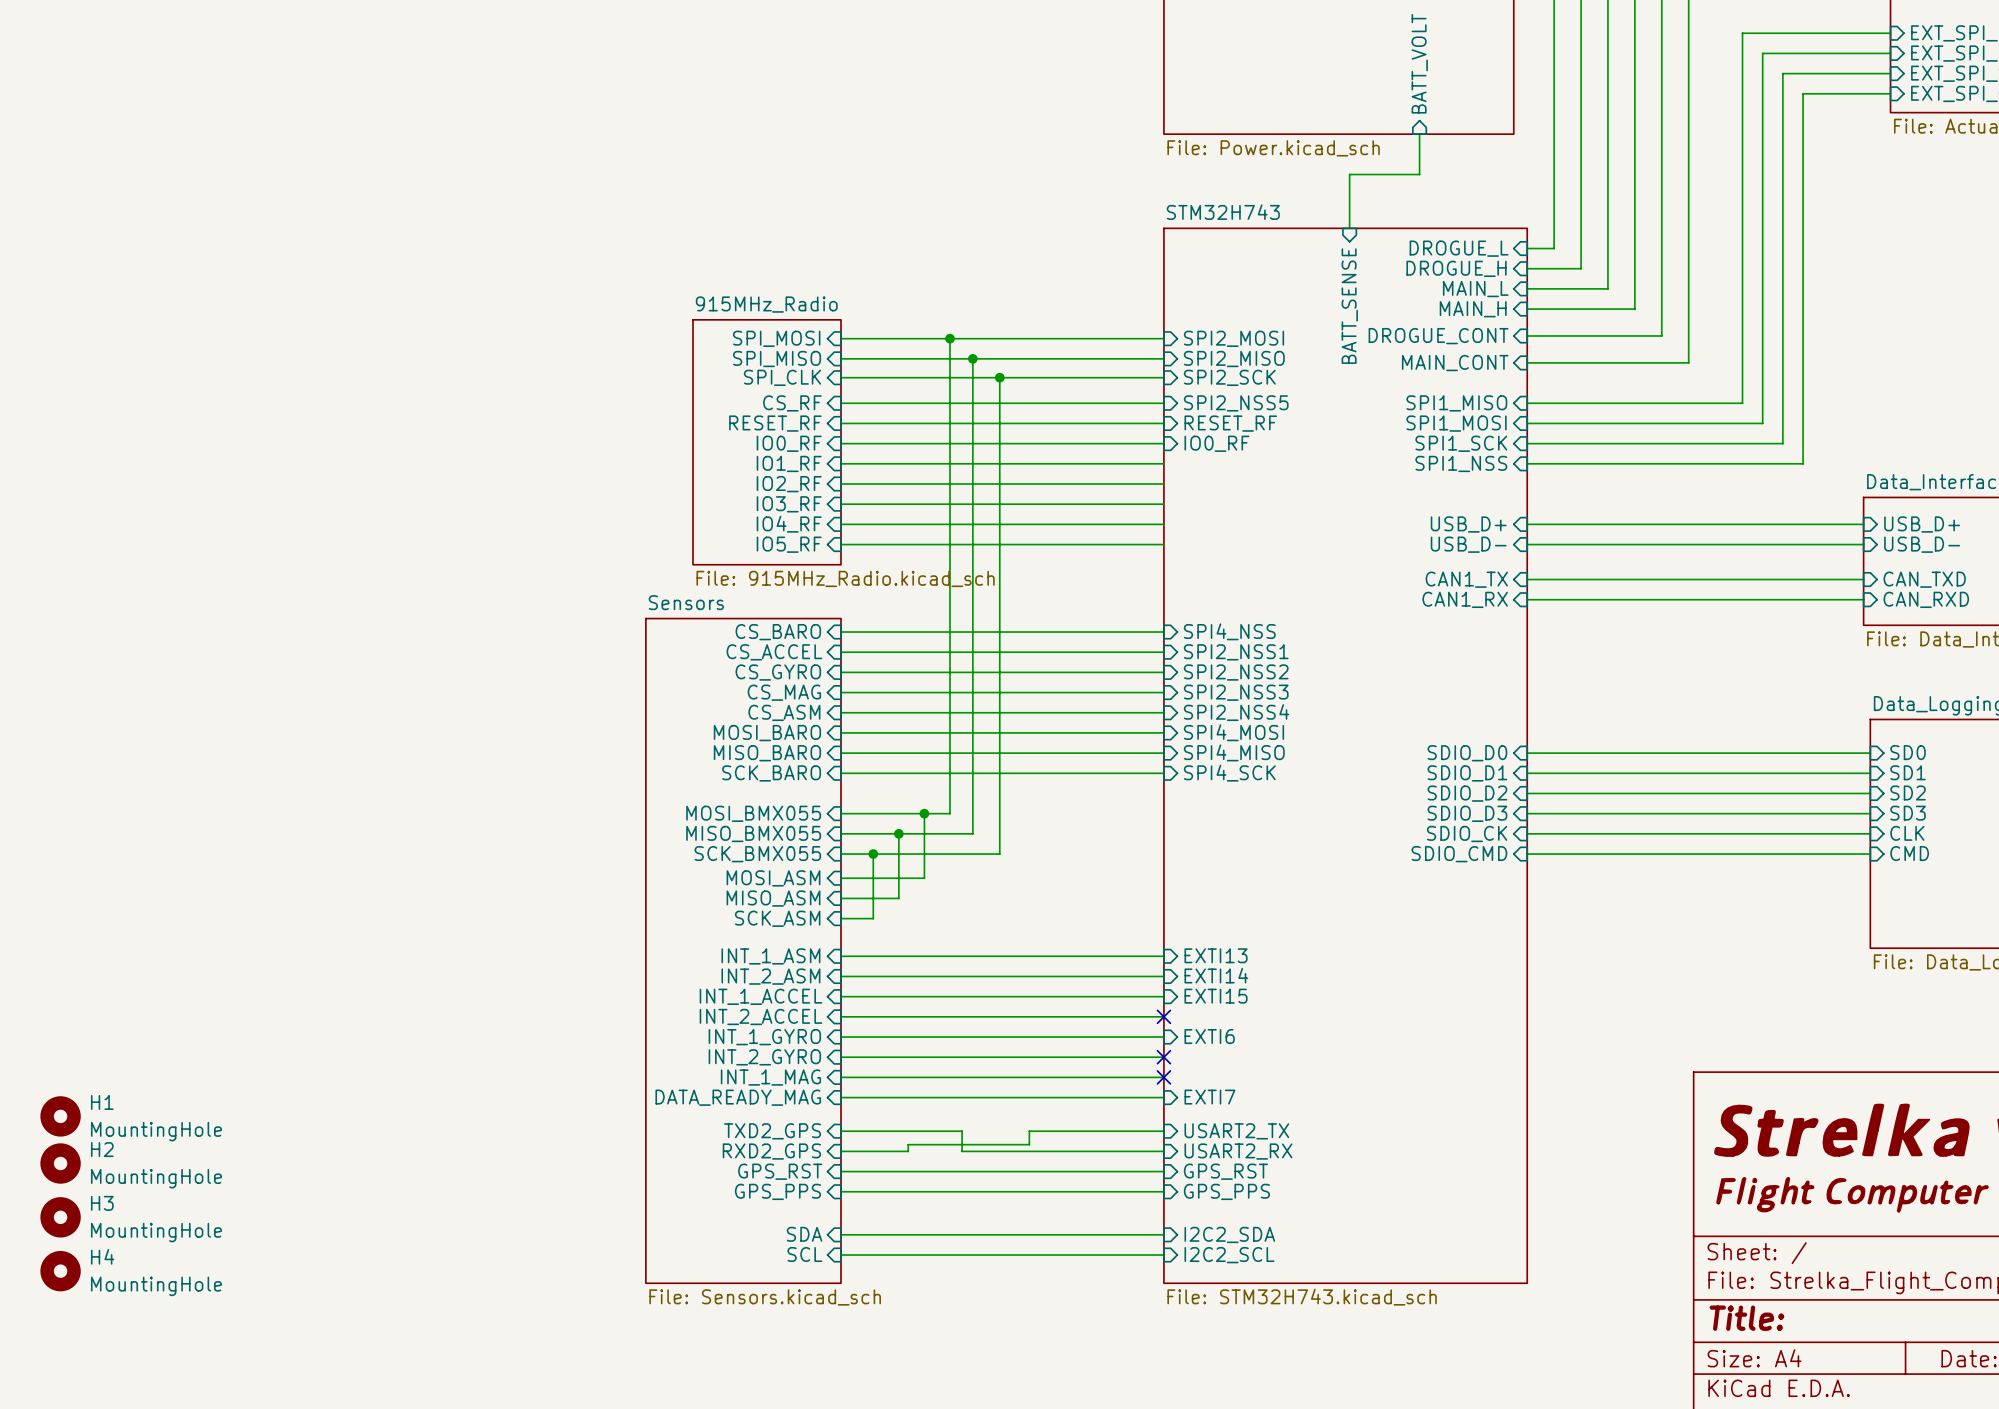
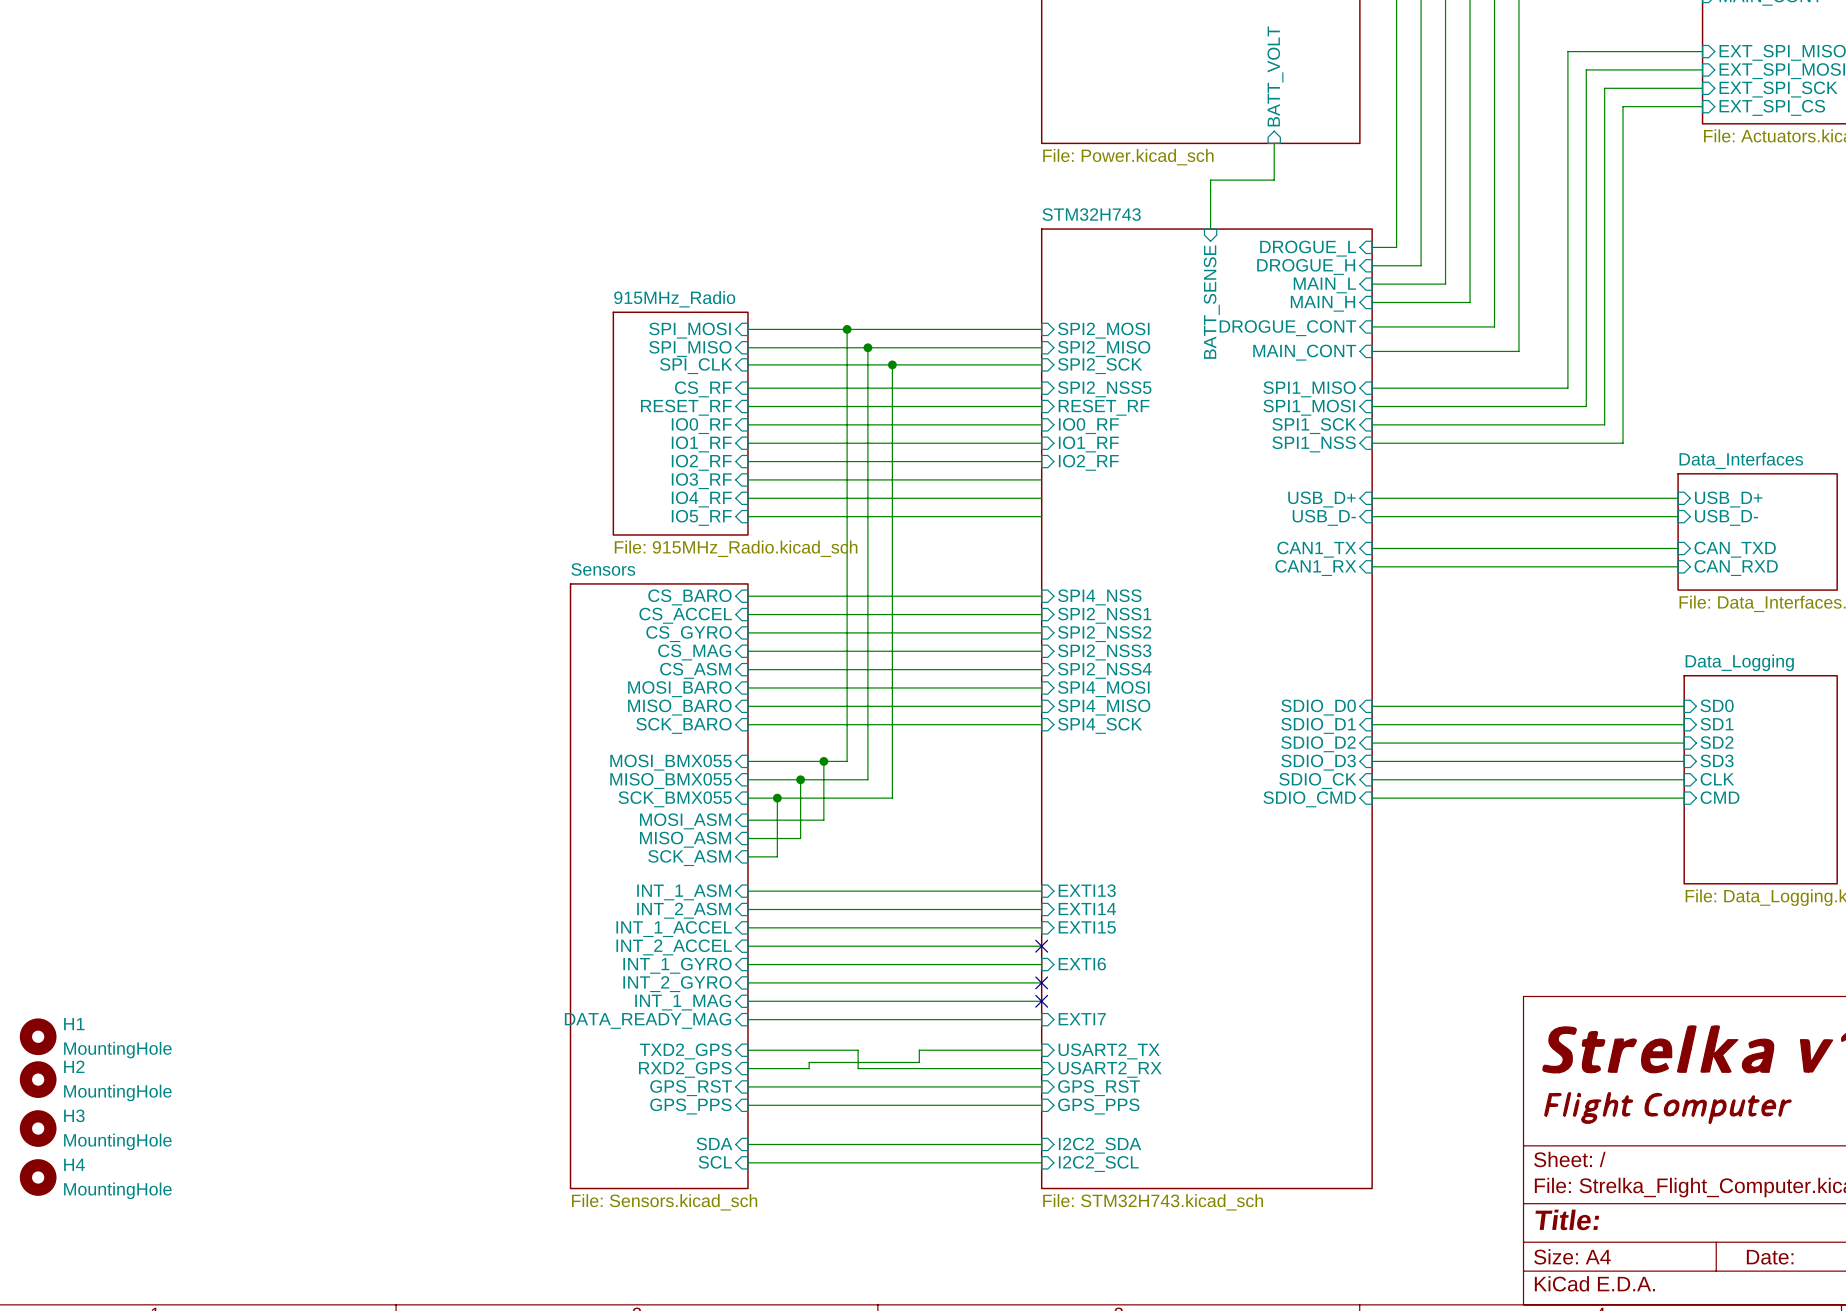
sheet pin: none -> IO1_RF (1088, 444)
sheet pin: none -> IO2_RF (1088, 462)

